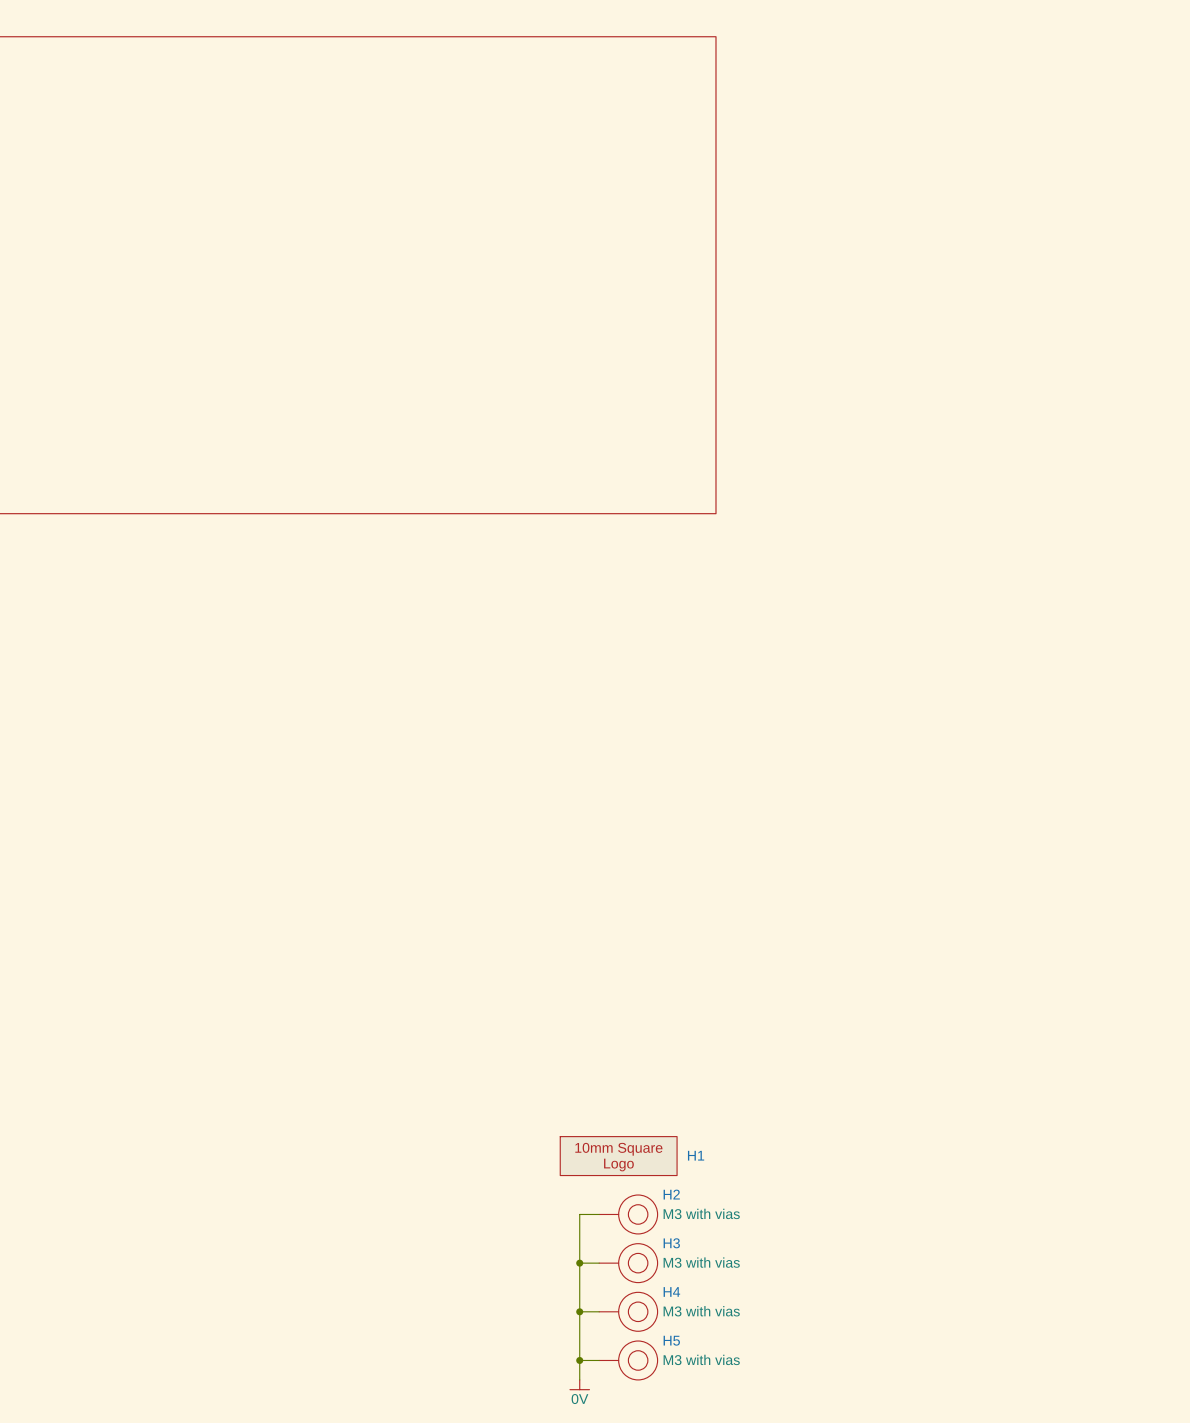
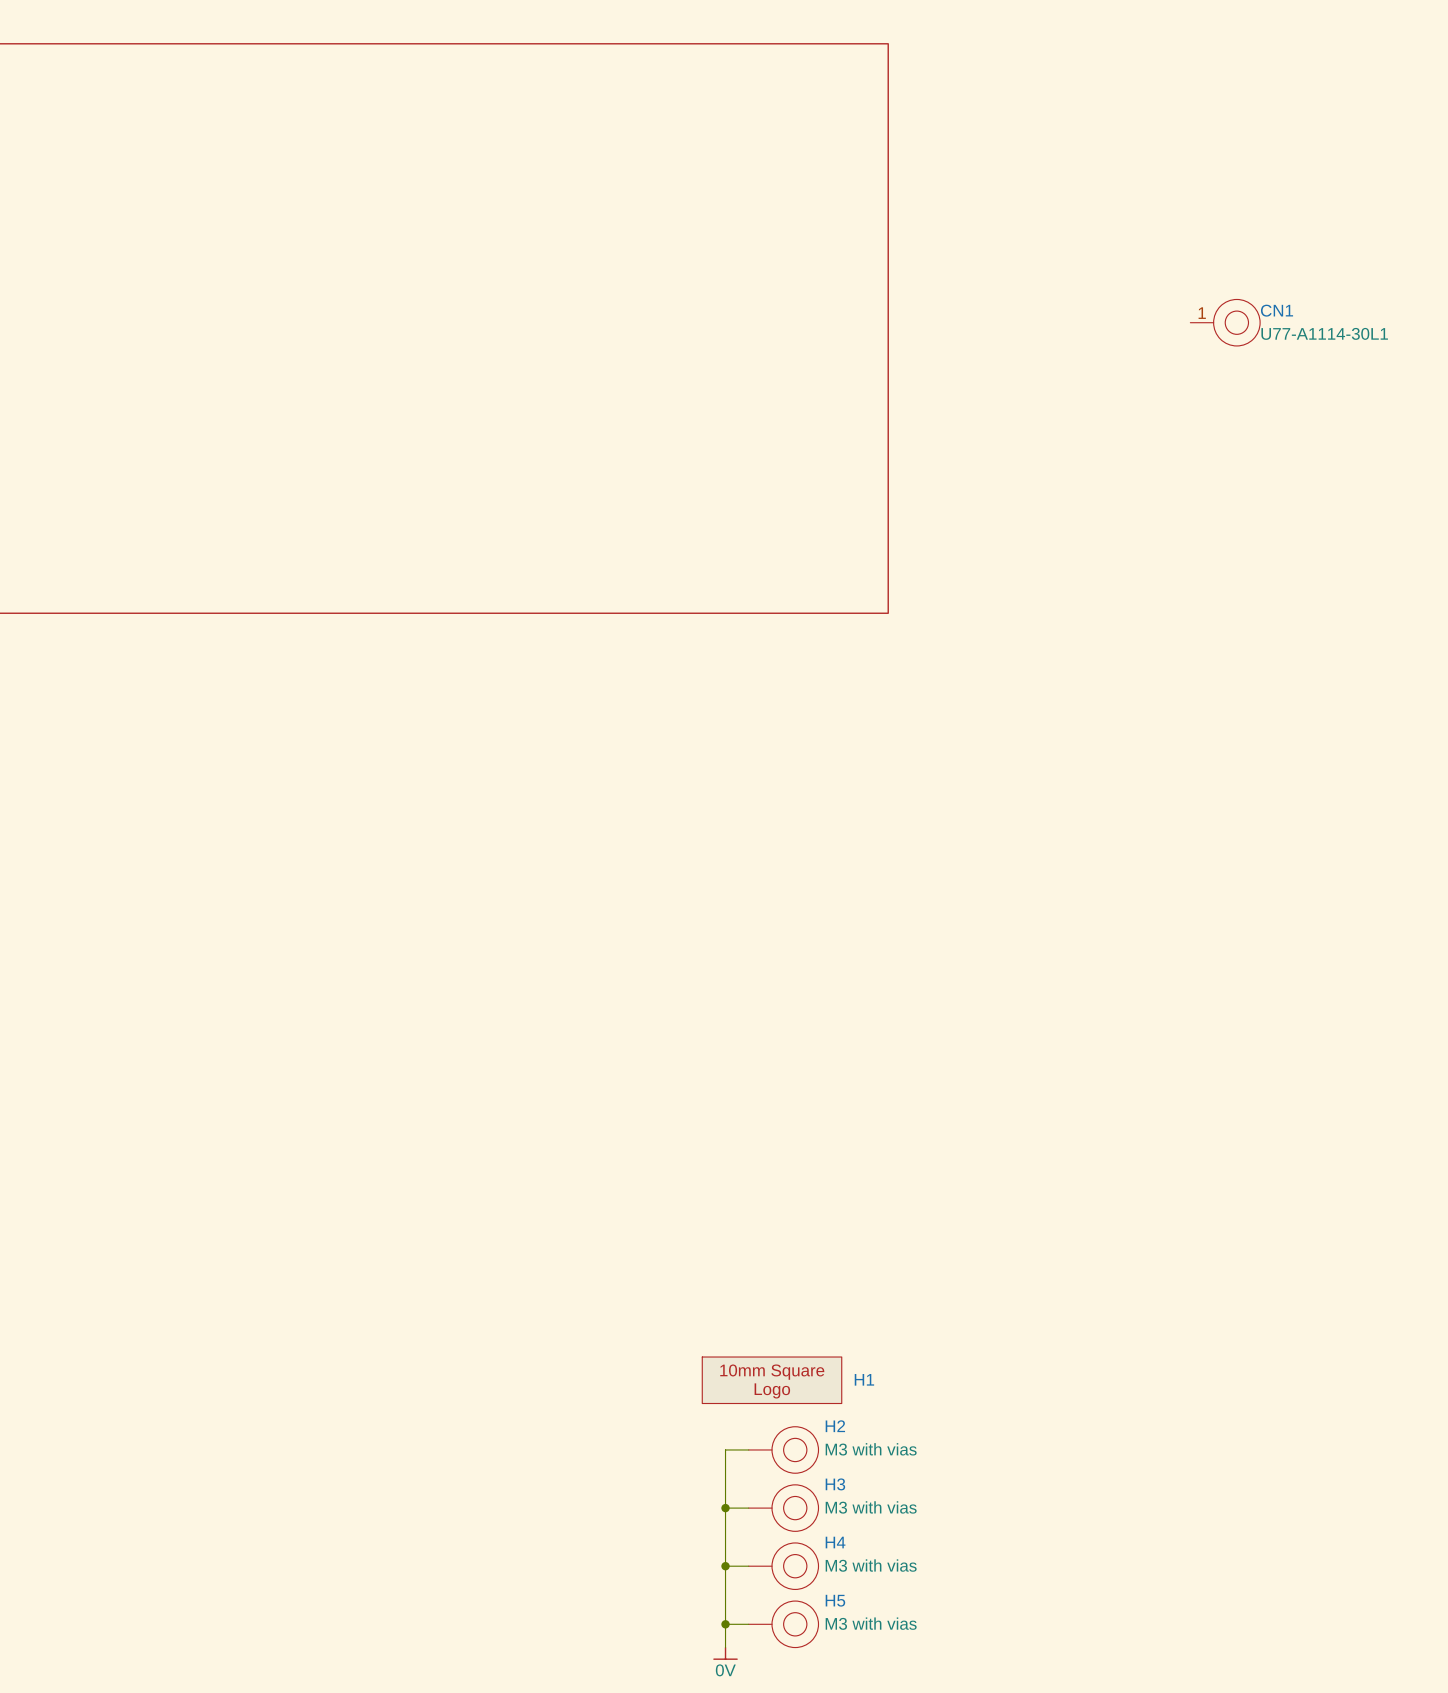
CN1: none -> U77-A1114-30L1 (1225, 322)

